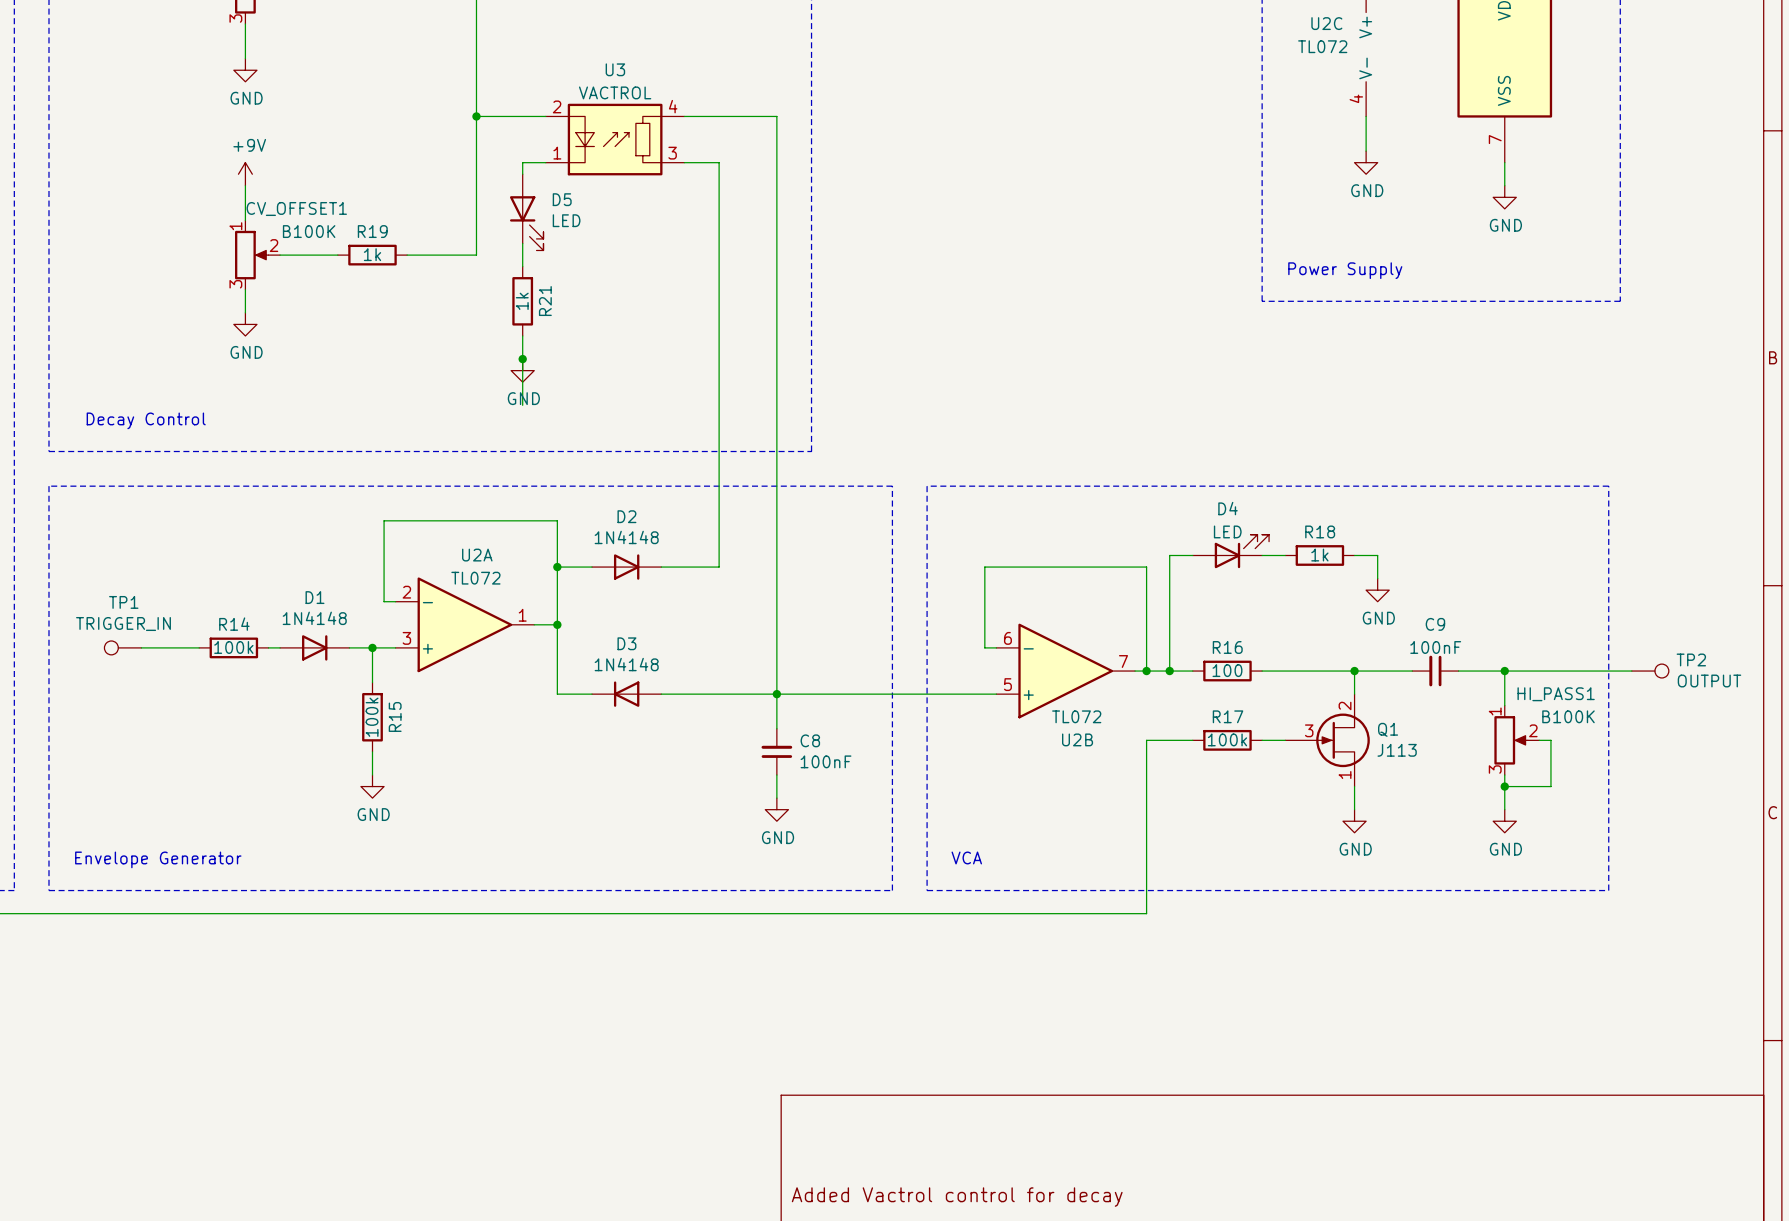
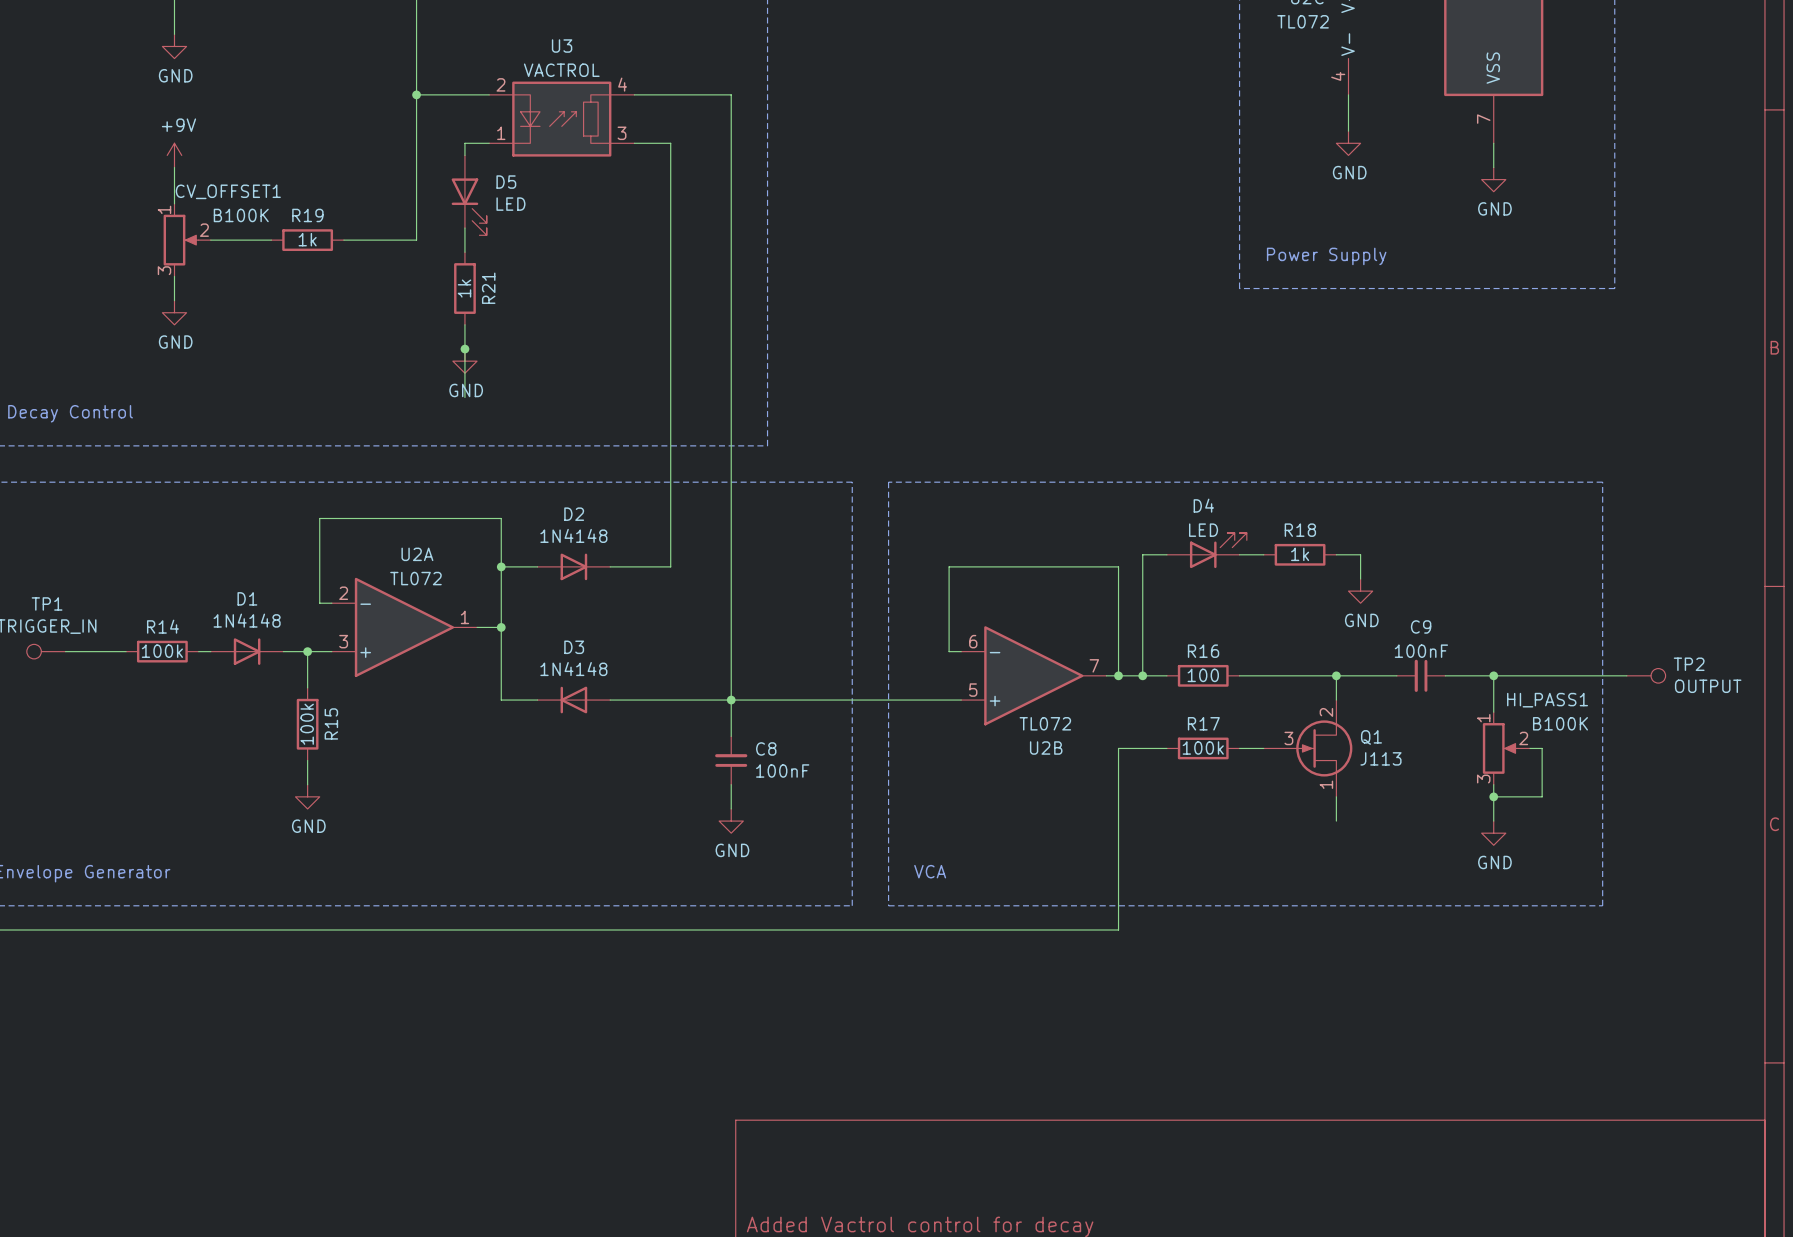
power symbol: GND (1354, 821) -> none

